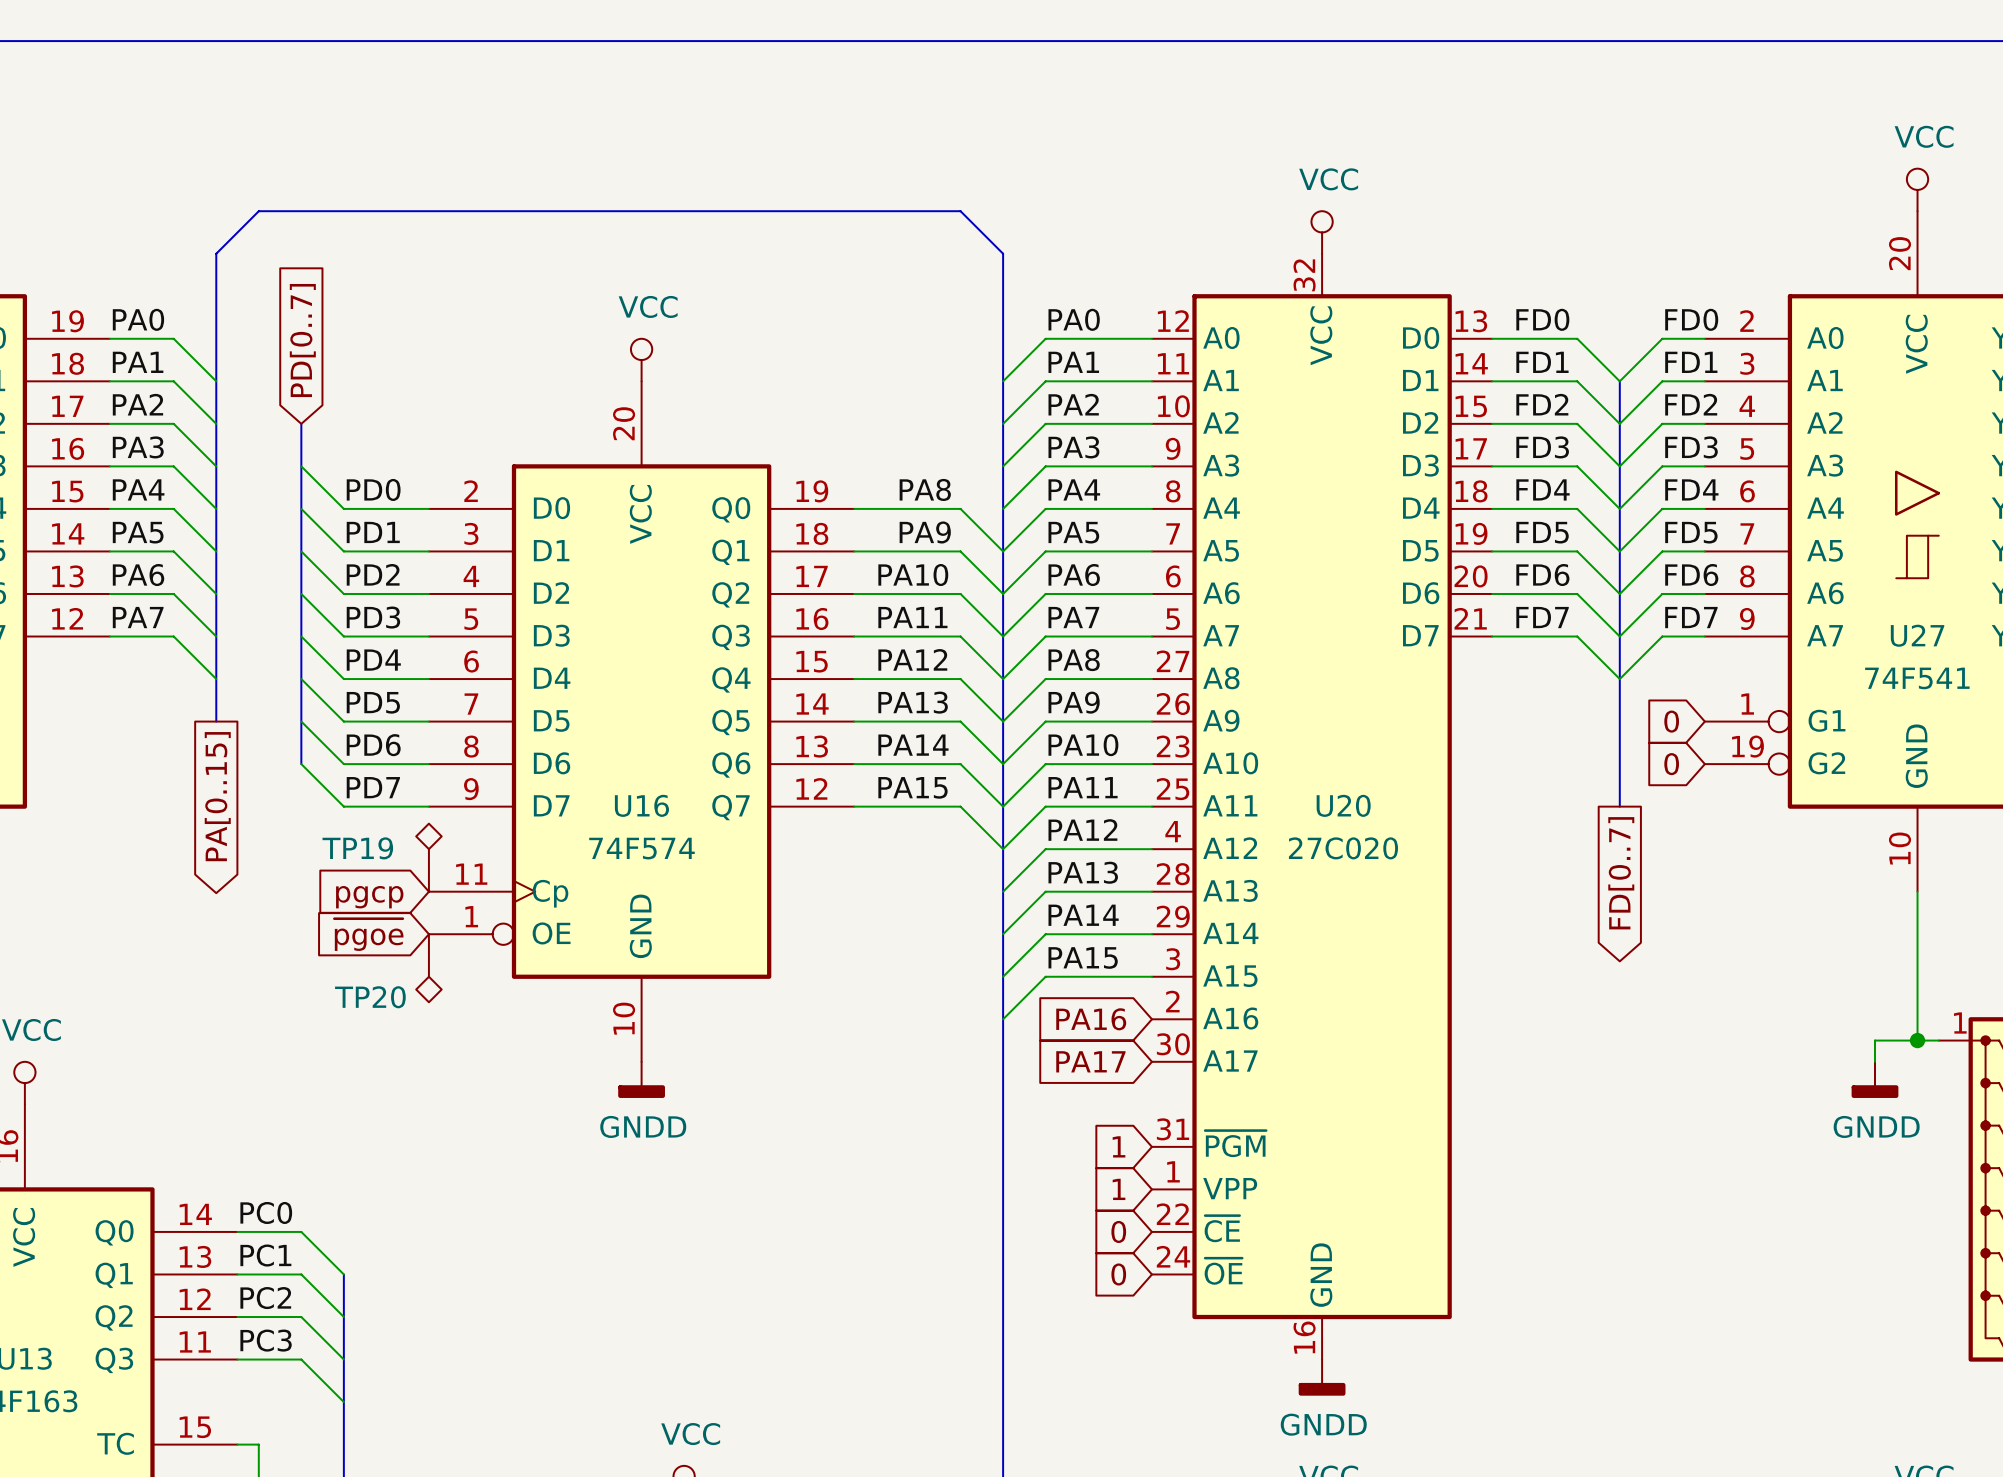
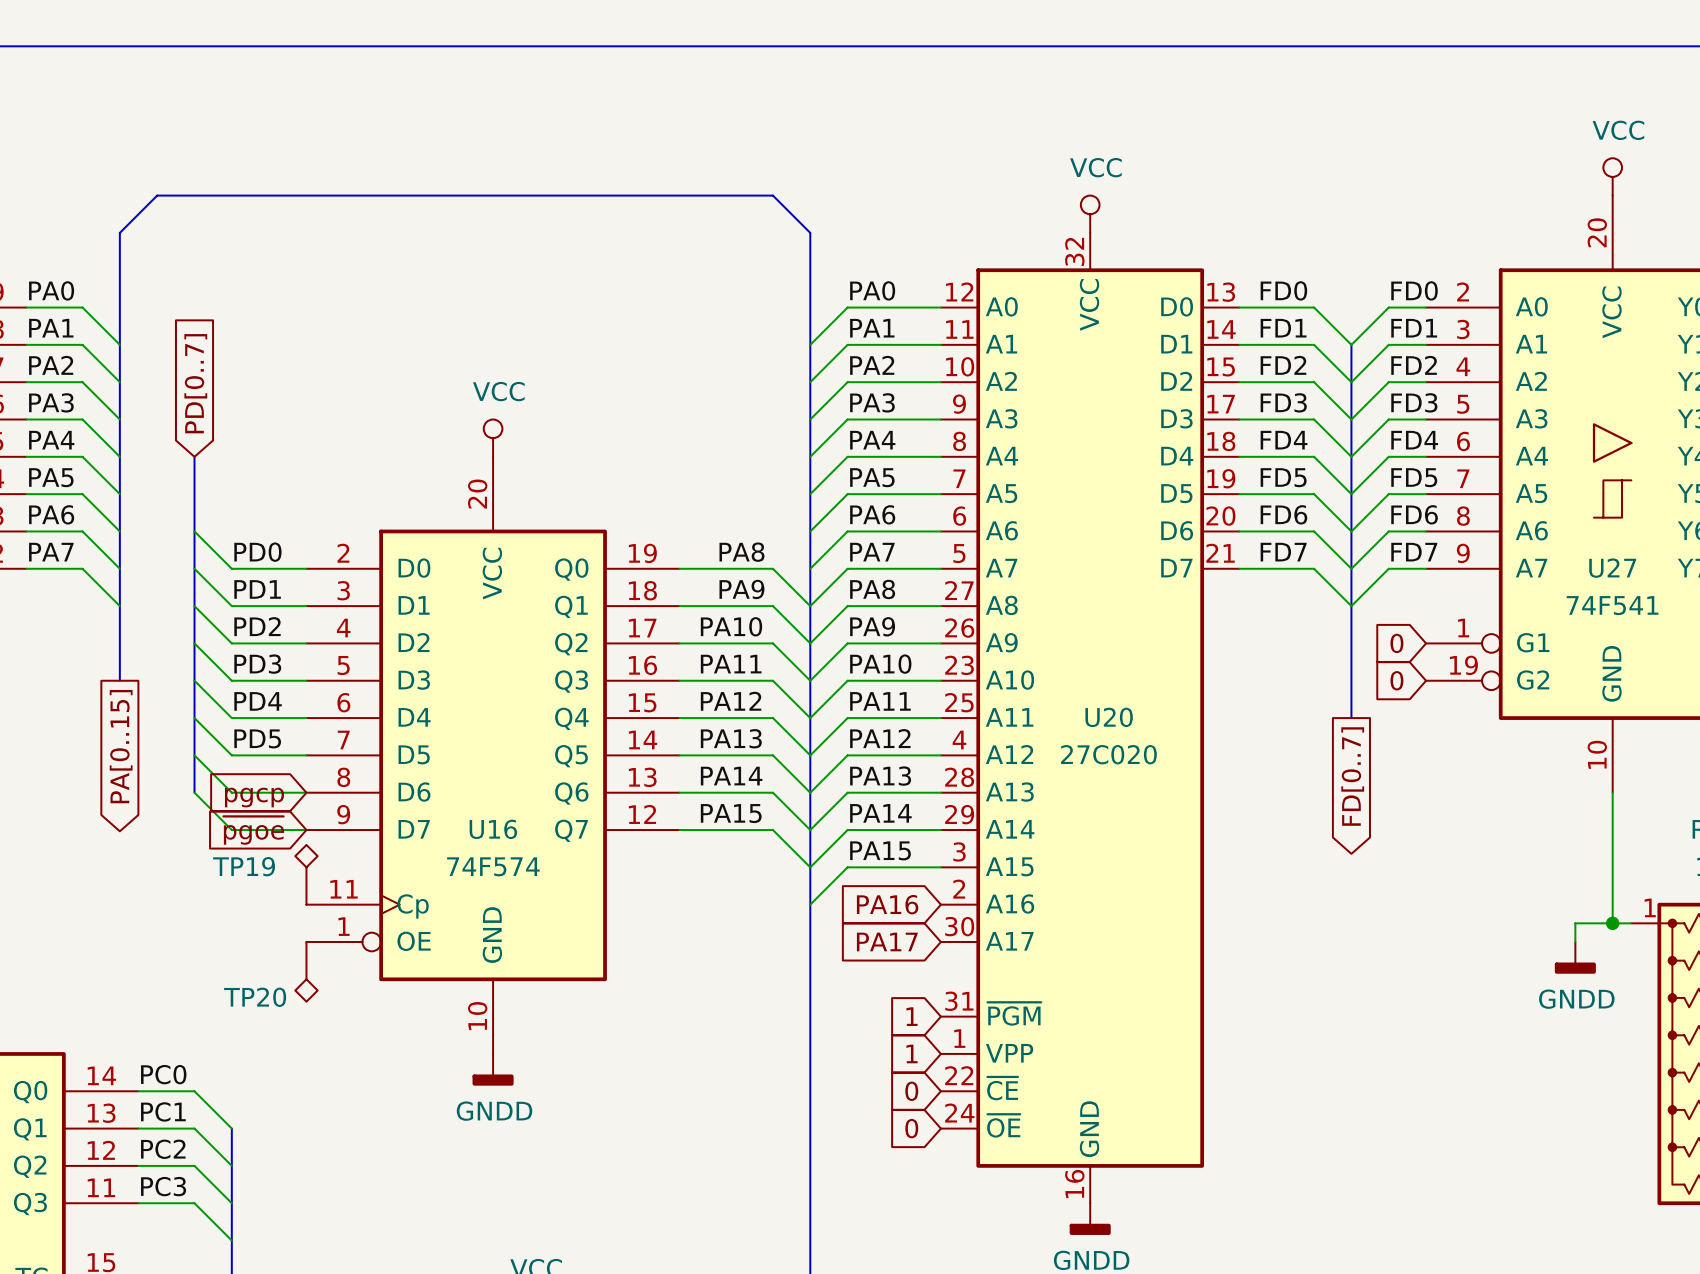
global label position: PD[0..7] (302, 340) -> PD[0..7] (195, 383)
power symbol position: VCC (641, 360) -> VCC (493, 438)
bus: (301, 423) (301, 508) -> none
wire: (301, 466) (343, 508) (428, 508) -> (194, 718) (231, 755) (306, 755)
label: PD0 (373, 489) -> none
label position: PA8 (925, 489) -> PA8 (741, 552)
wire: (301, 508) (343, 551) (428, 551) -> (194, 755) (231, 792) (306, 792)
wire: (854, 508) (960, 508) (1003, 551) -> (679, 755) (772, 755) (810, 792)
label: PD1 (373, 532) -> none
label position: PA9 (925, 532) -> PA9 (741, 589)
wire: (301, 551) (343, 593) (428, 593) -> (194, 792) (231, 830) (306, 830)
wire: (854, 551) (960, 551) (1003, 593) -> (679, 792) (772, 792) (810, 830)
label: PD2 (373, 574) -> none
label: PA10 (913, 575) -> none
wire: (854, 593) (960, 593) (1003, 636) -> (679, 830) (772, 830) (810, 867)
label: PD3 (373, 617) -> PD0 (257, 552)
label: PA11 (912, 617) -> none
label: PA12 (912, 659) -> none
label: PD4 (373, 660) -> PD1 (257, 589)
label: PD5 (373, 702) -> PD2 (257, 626)
label: PA13 (913, 702) -> PA10 (731, 626)
bus: none -> (119, 643) (119, 680)
U16 position: (641, 721) -> (493, 755)
label: PD6 (373, 745) -> PD3 (257, 664)
label: PA14 (913, 745) -> PA11 (731, 664)
bus: none -> (194, 680) (194, 792)
label: PD7 (373, 787) -> PD4 (258, 701)
label: PA15 (913, 787) -> PA12 (731, 701)
global label position: PA[0..15] (217, 796) -> PA[0..15] (121, 746)
label: none -> PD5 (257, 738)
label: none -> PA13 (731, 738)
TP19 position: (428, 857) -> (306, 874)
label: none -> PA14 (731, 776)
label: none -> PA15 (731, 813)
TP20 position: (428, 968) -> (306, 971)
power symbol position: GNDD (641, 1079) -> GNDD (493, 1069)

